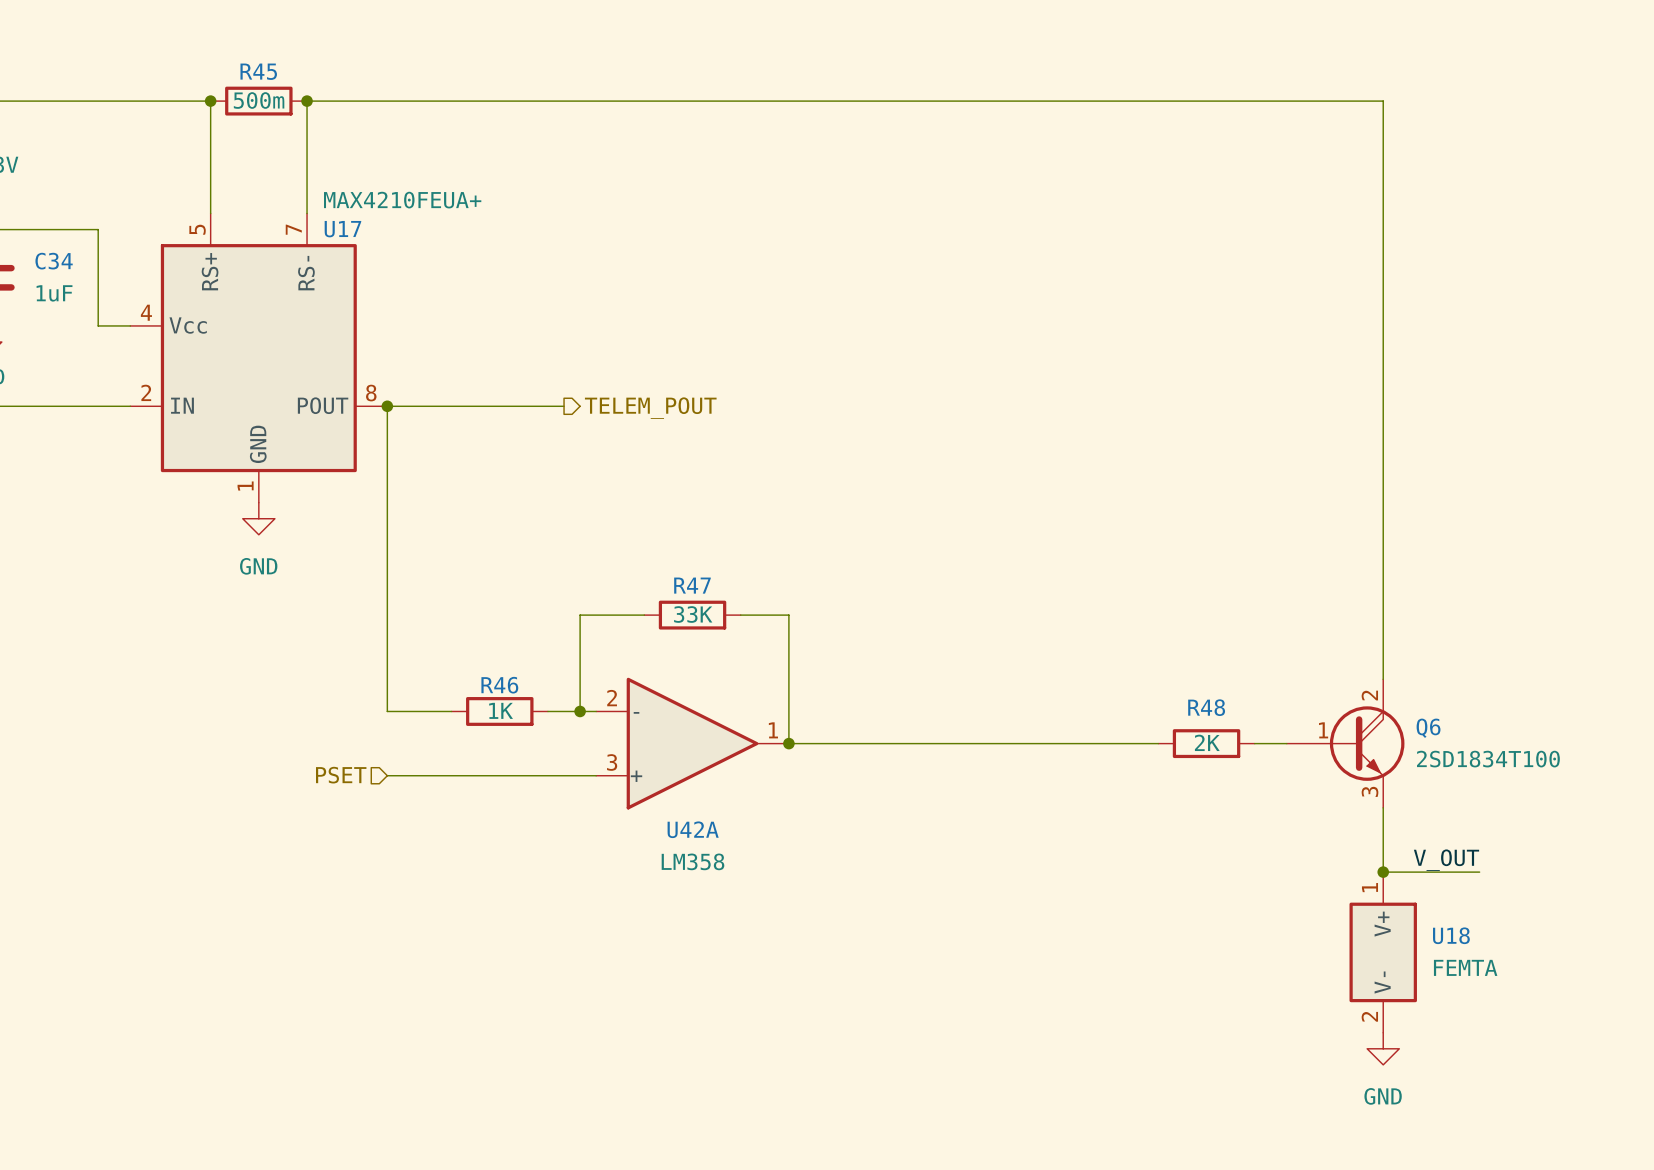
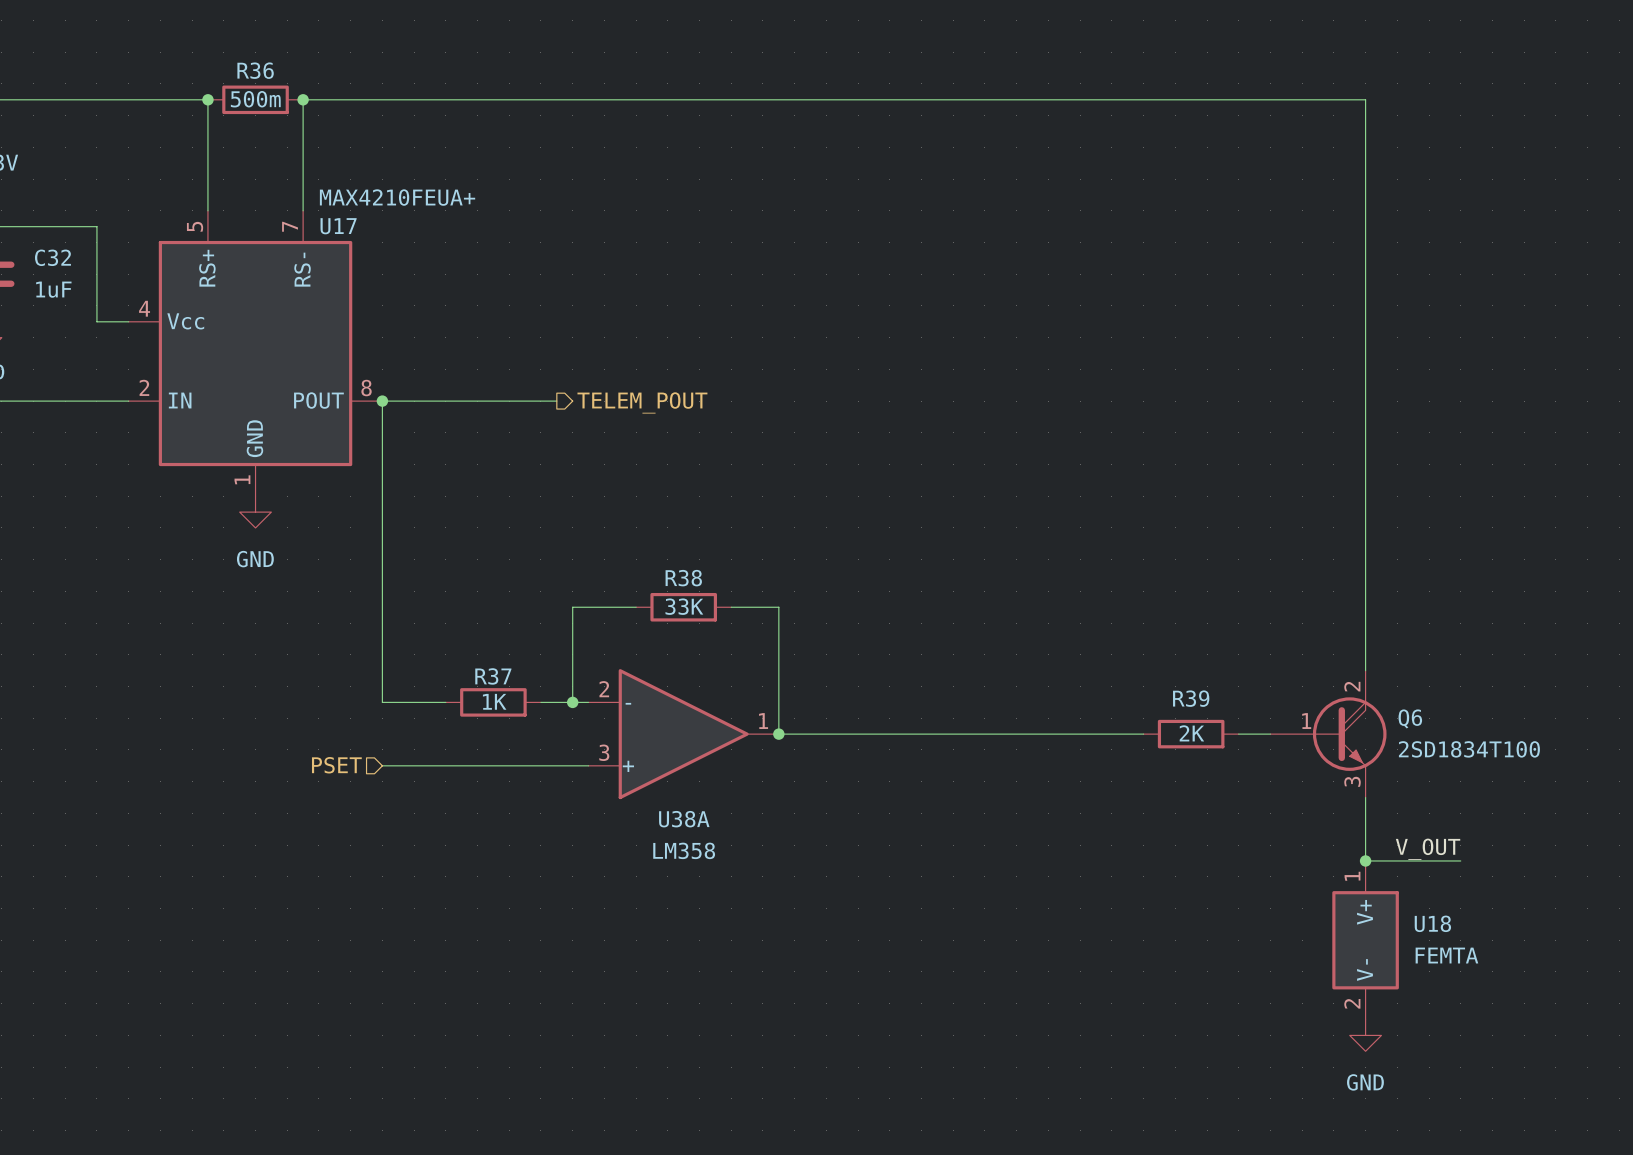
R45 name: R45 (258, 71) -> R36 (255, 70)
C34 name: C34 (54, 261) -> C32 (52, 257)
R47 name: R47 (692, 585) -> R38 (683, 578)
R46 name: R46 (499, 685) -> R37 (493, 676)
R48 name: R48 (1206, 707) -> R39 (1191, 698)
U42A name: U42A (693, 829) -> U38A (684, 819)

